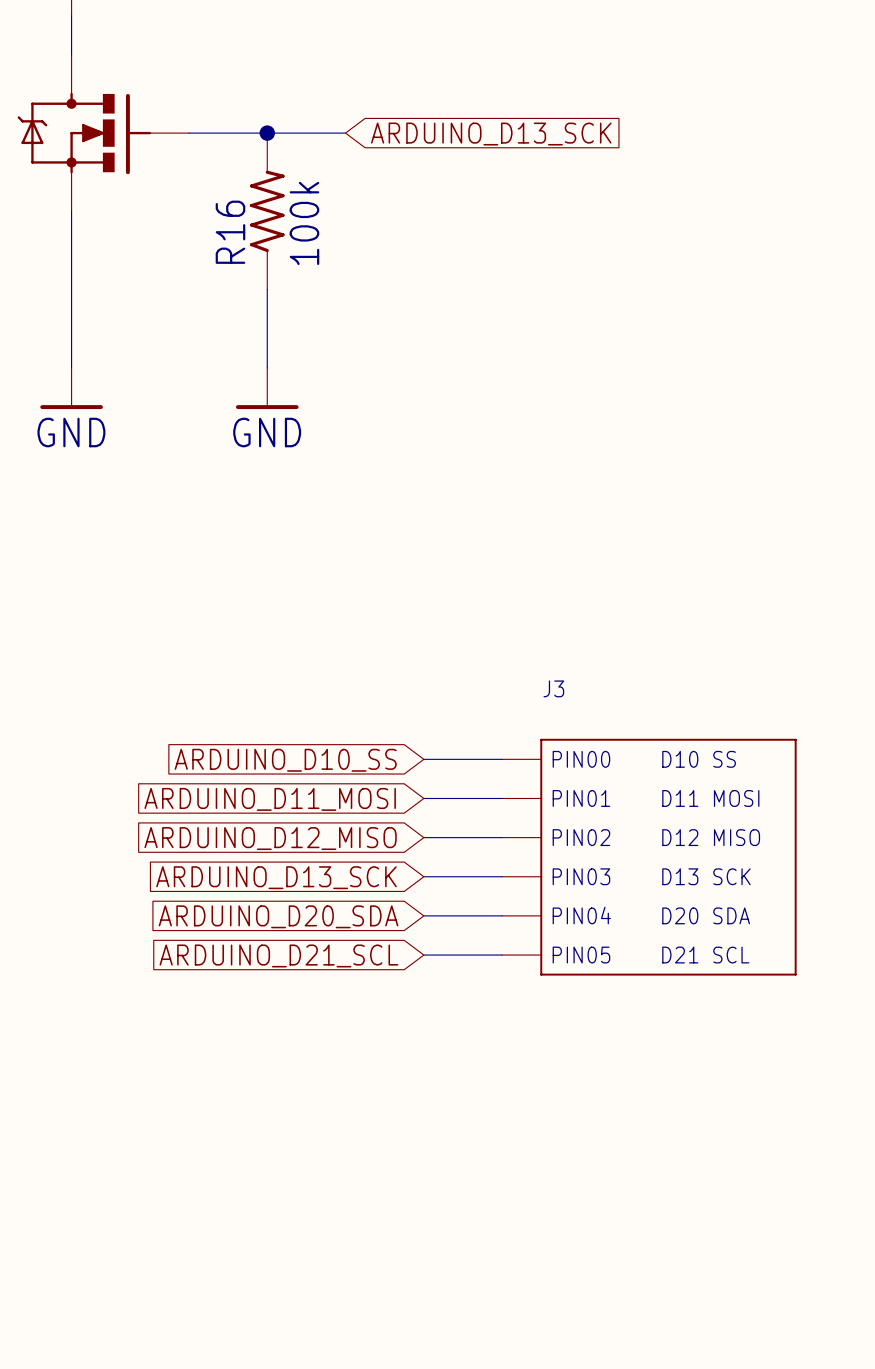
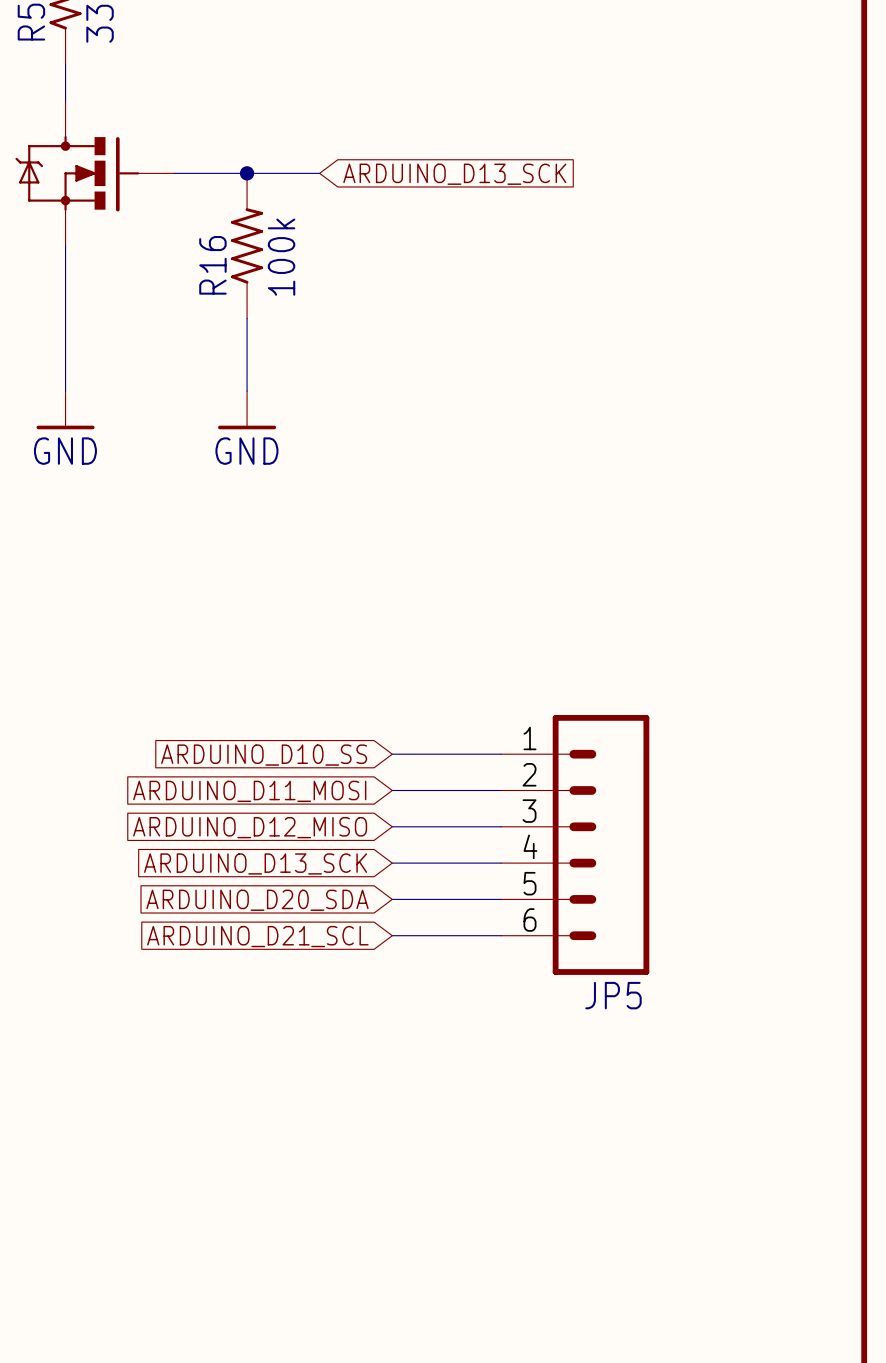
JP5: none -> (575, 844)
J3: (649, 857) -> none

